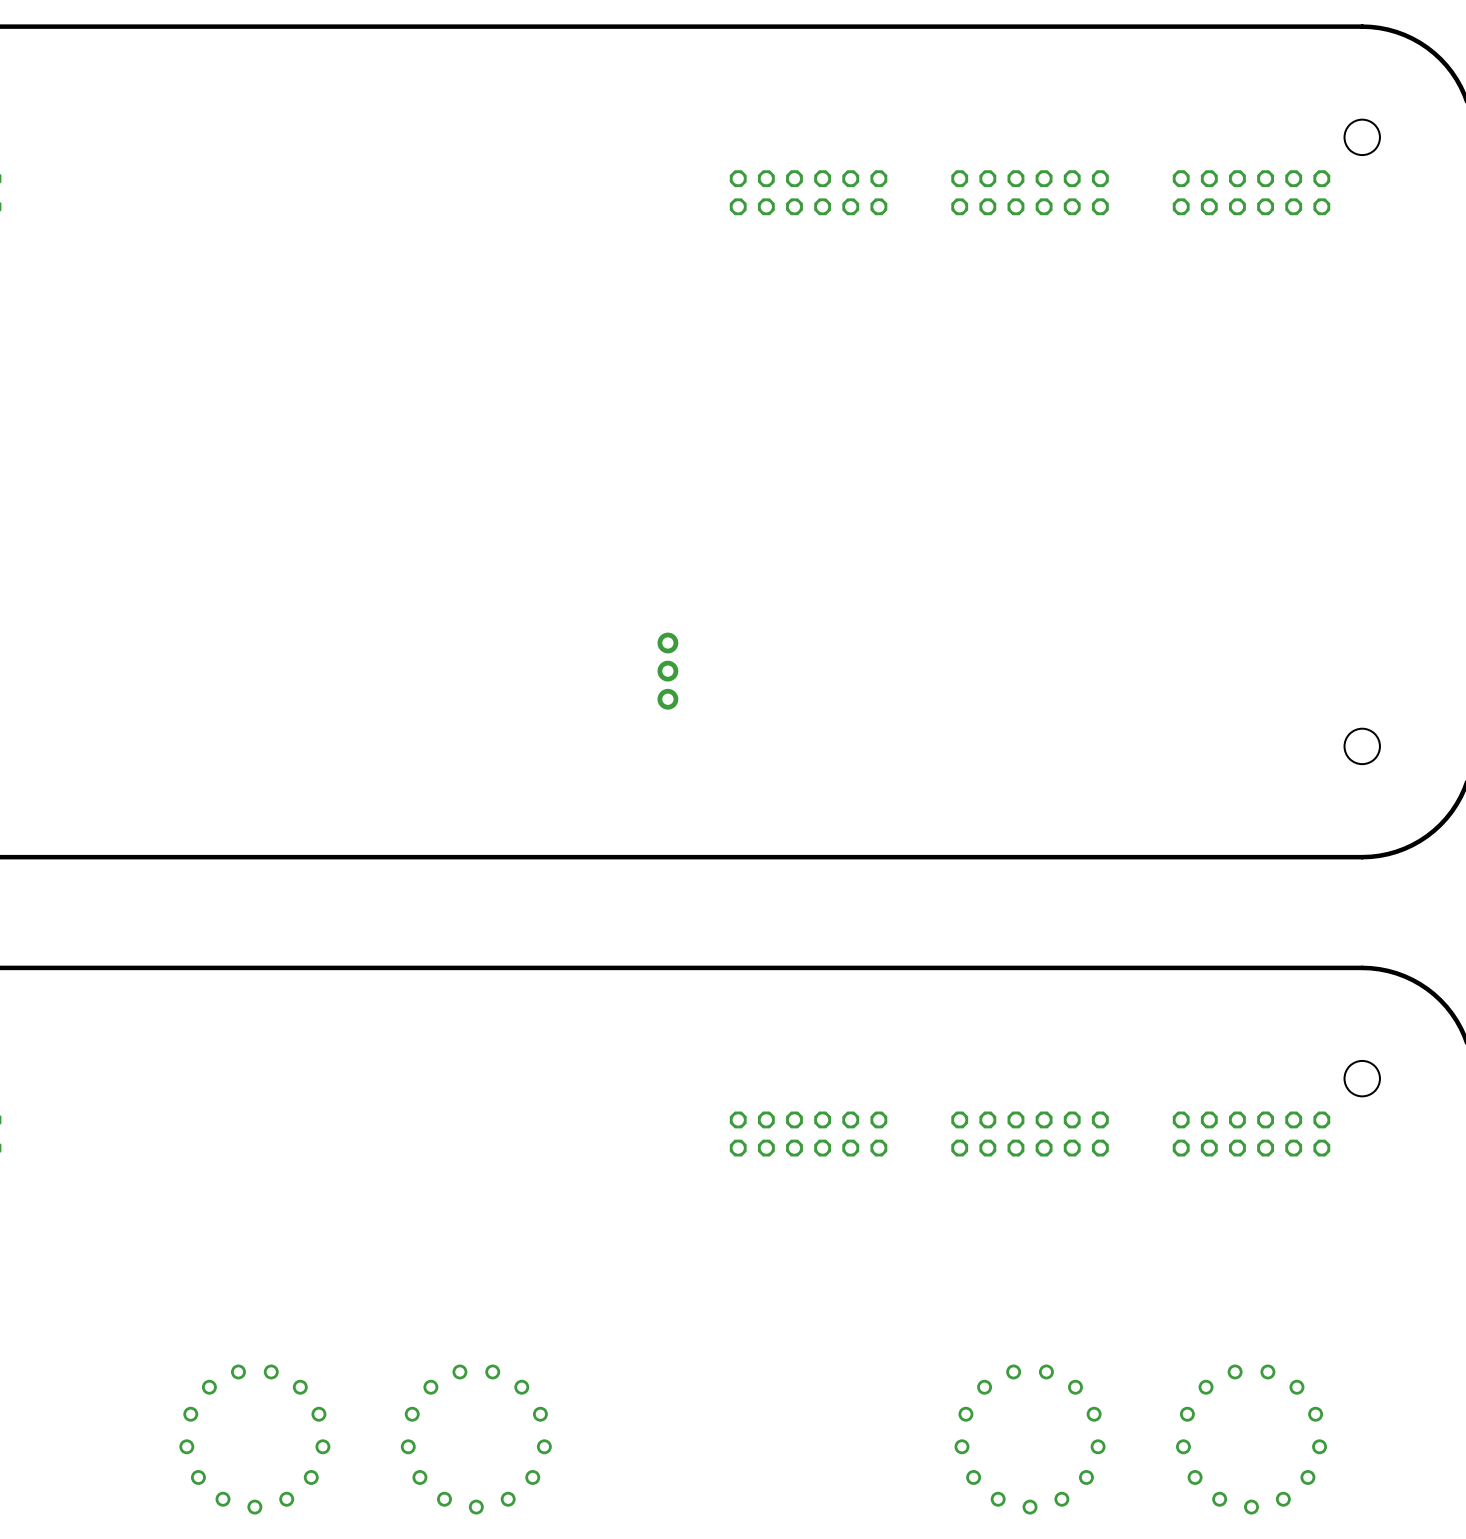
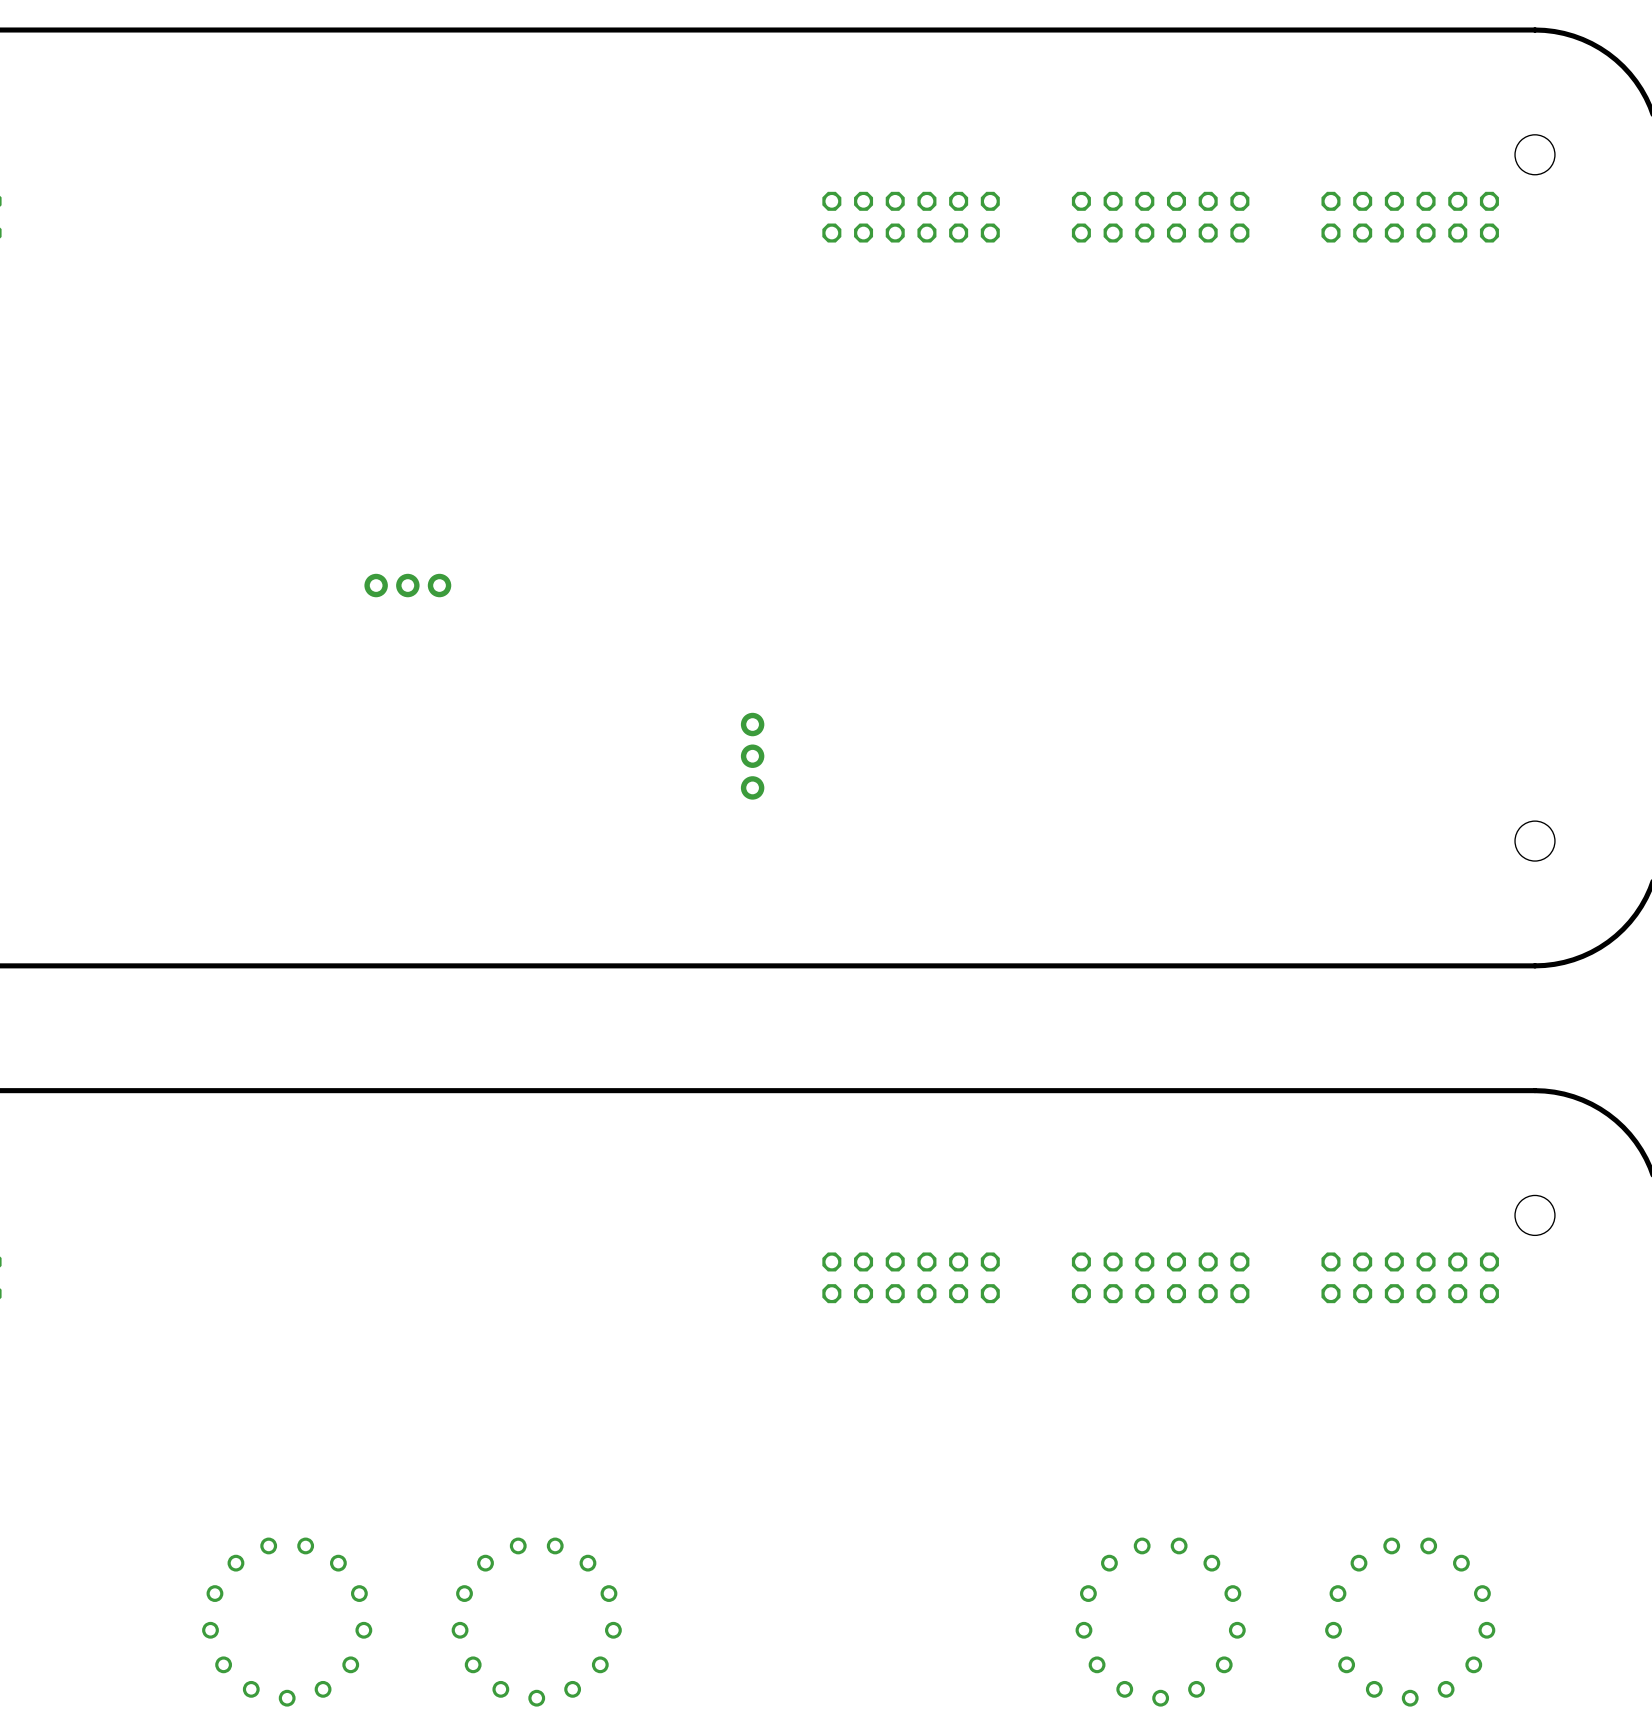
part: none -> (407, 585)

